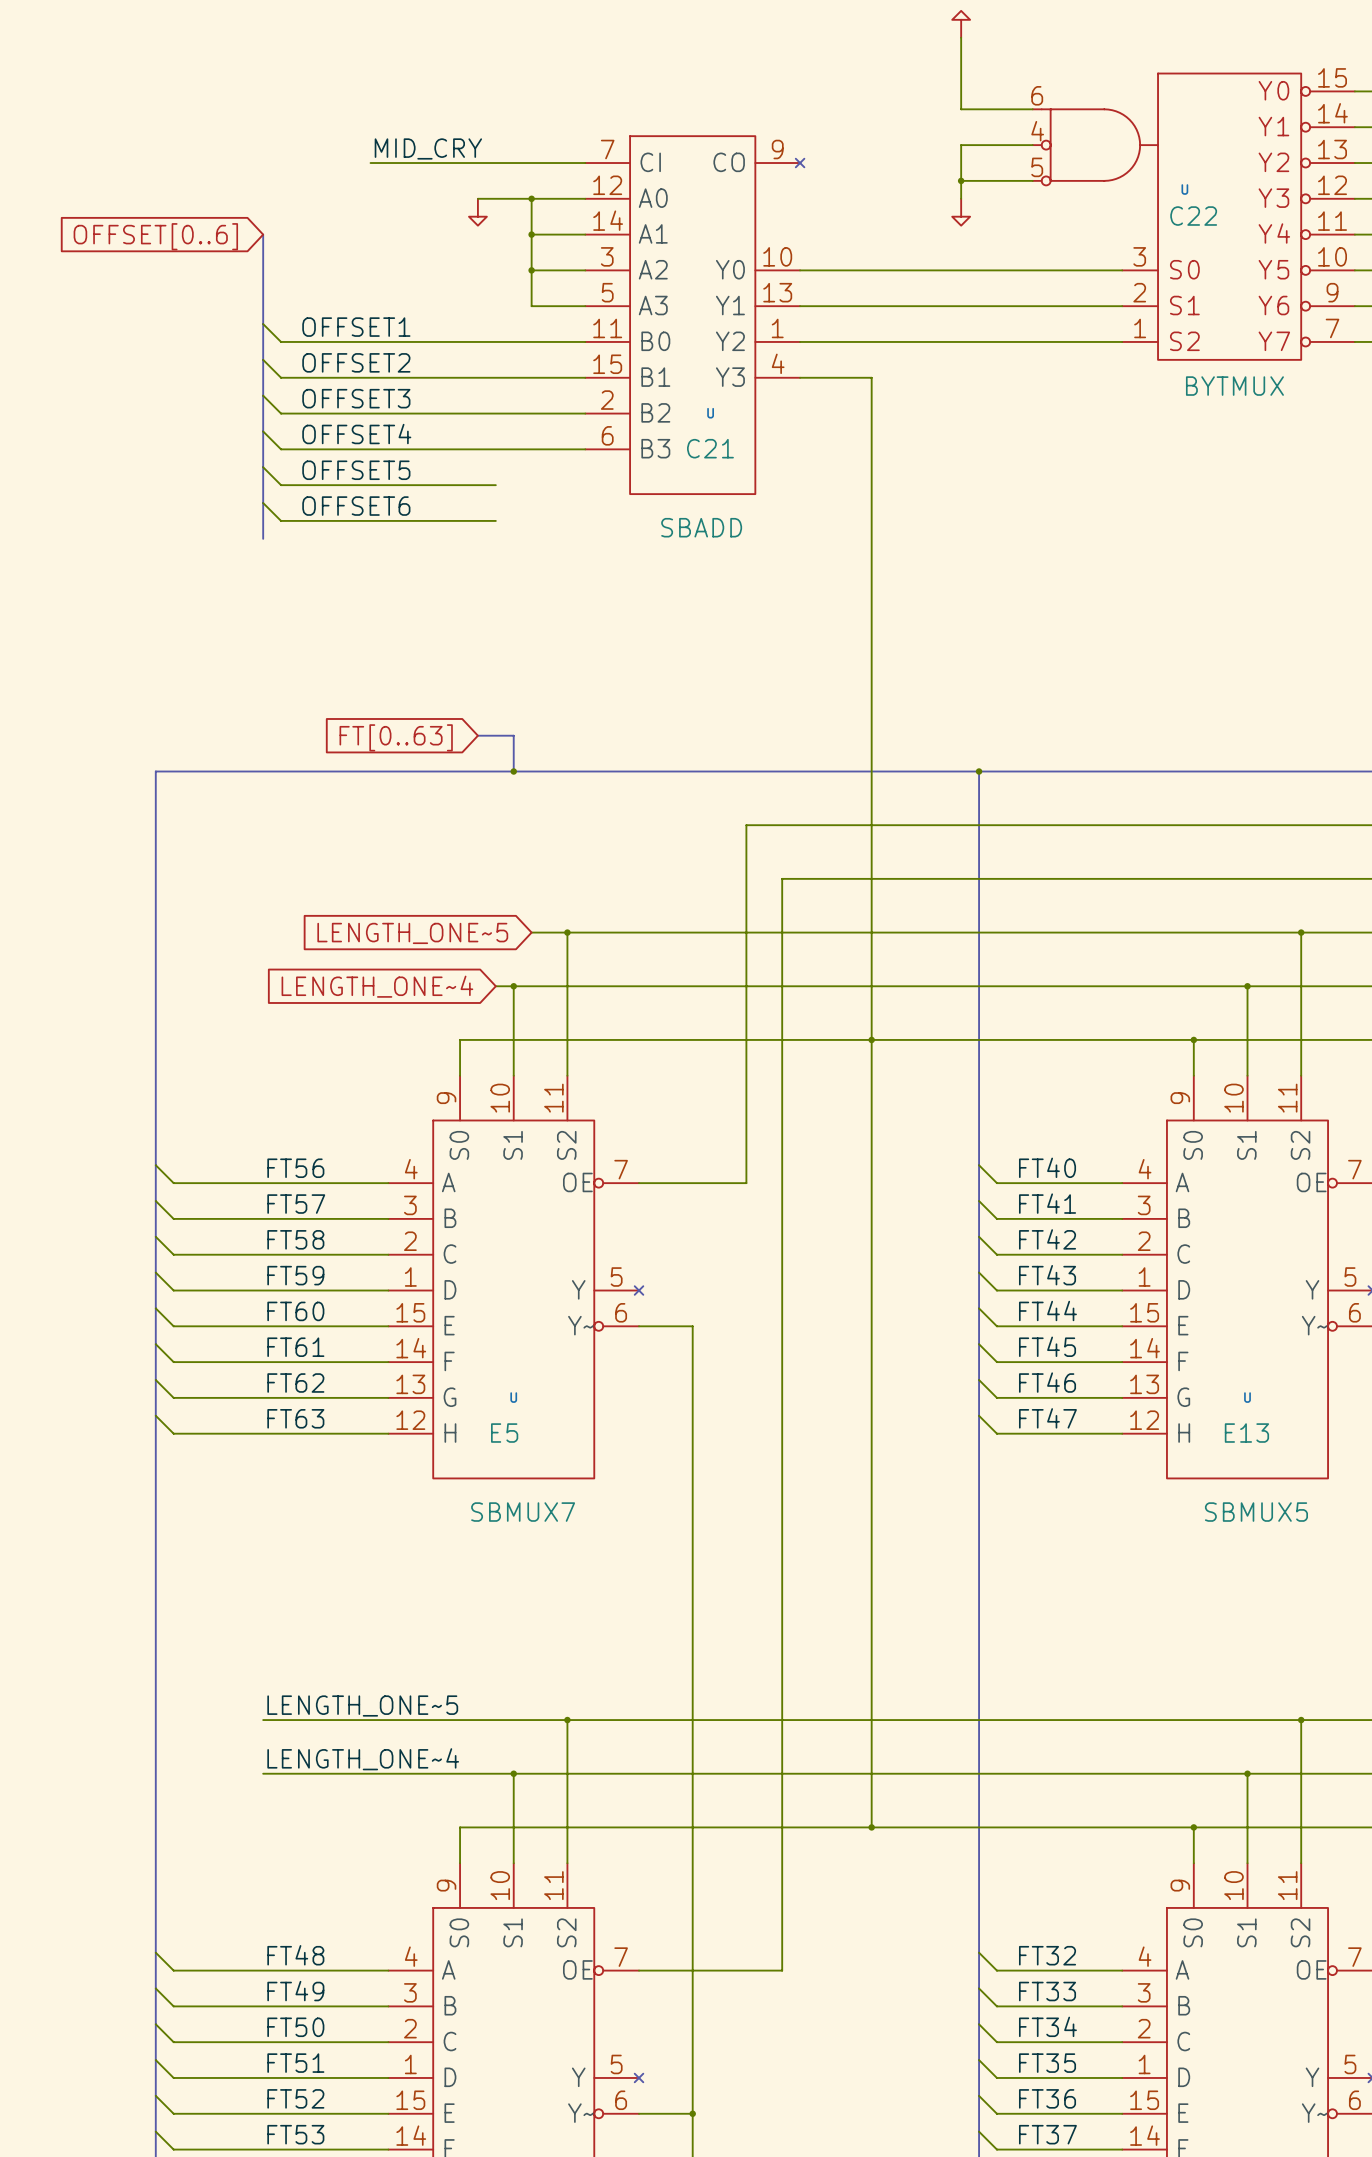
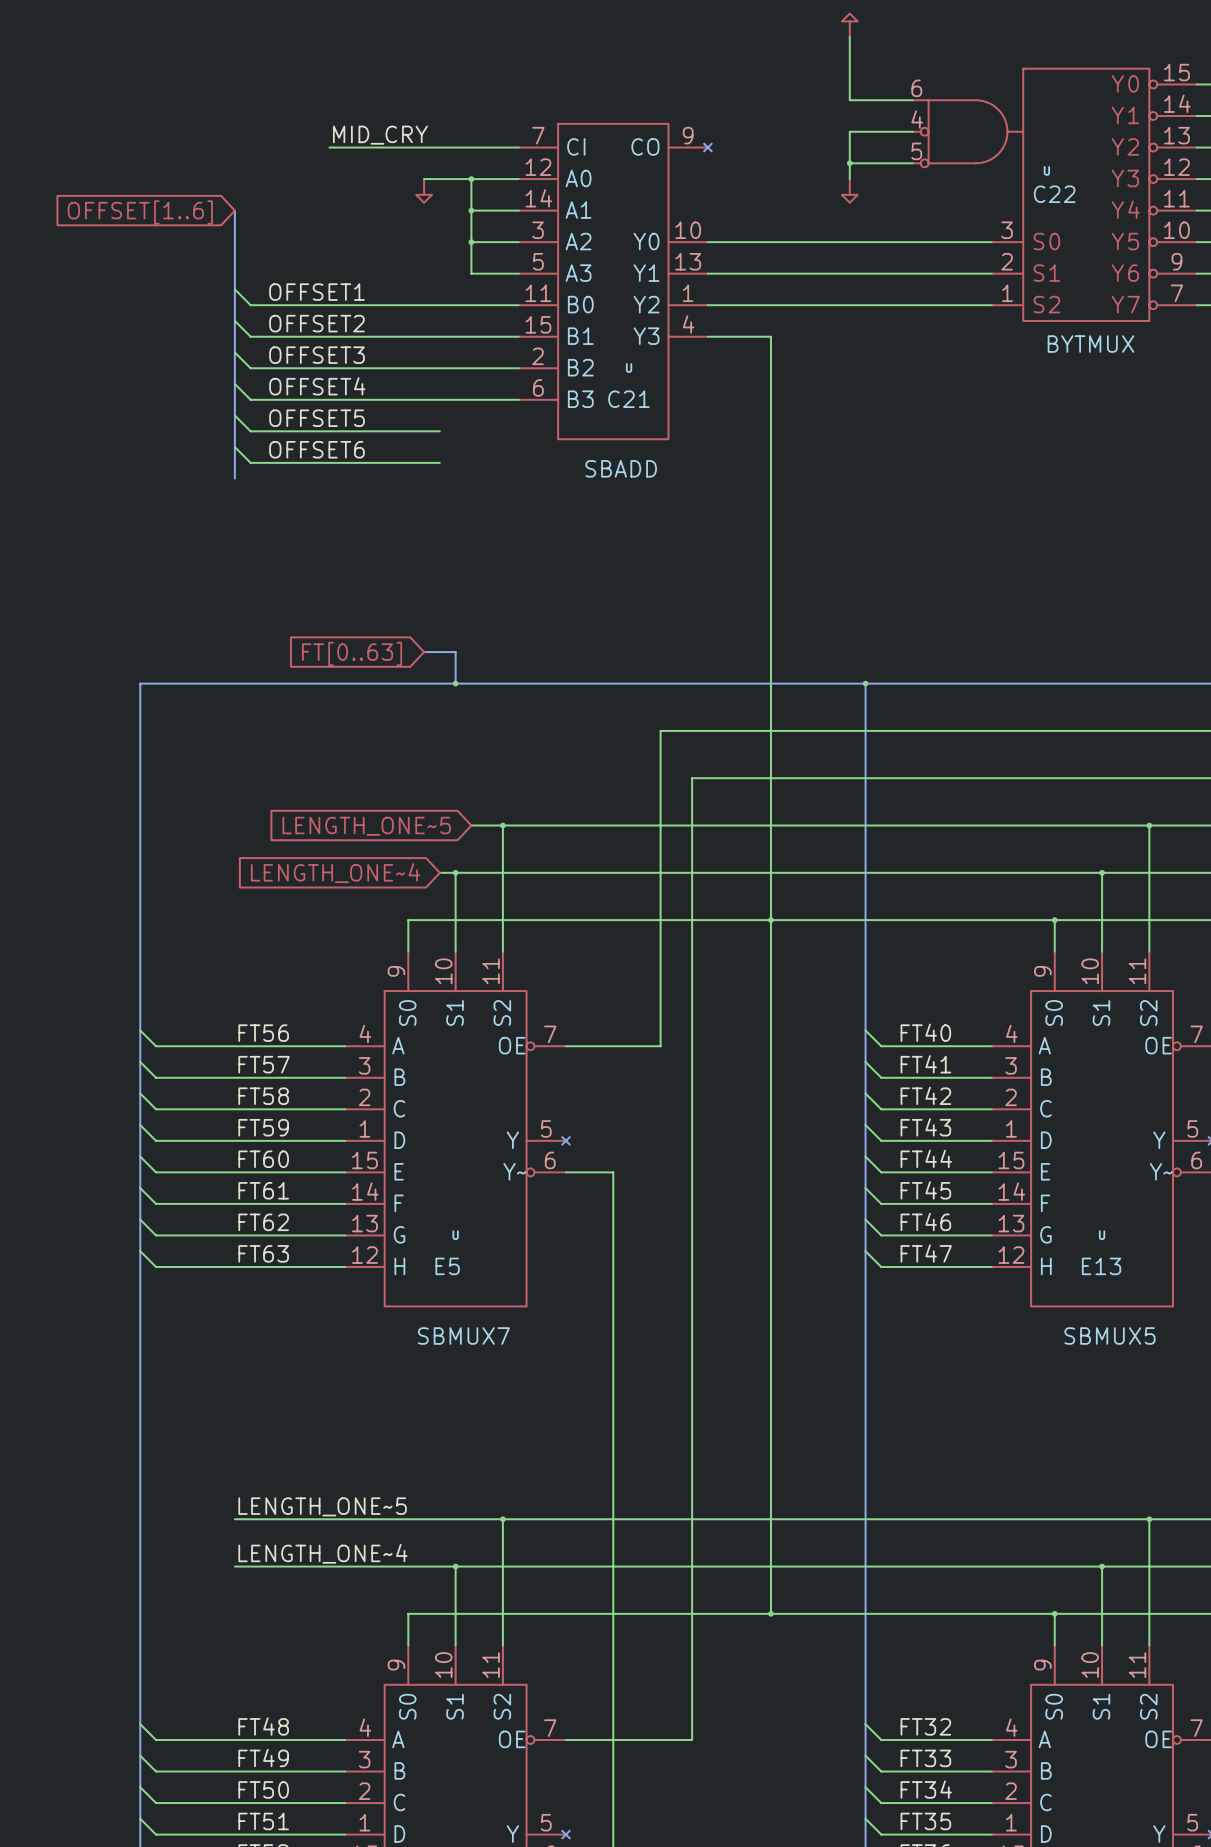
global label: OFFSET[0..6] (155, 236) -> OFFSET[1..6] (140, 212)

